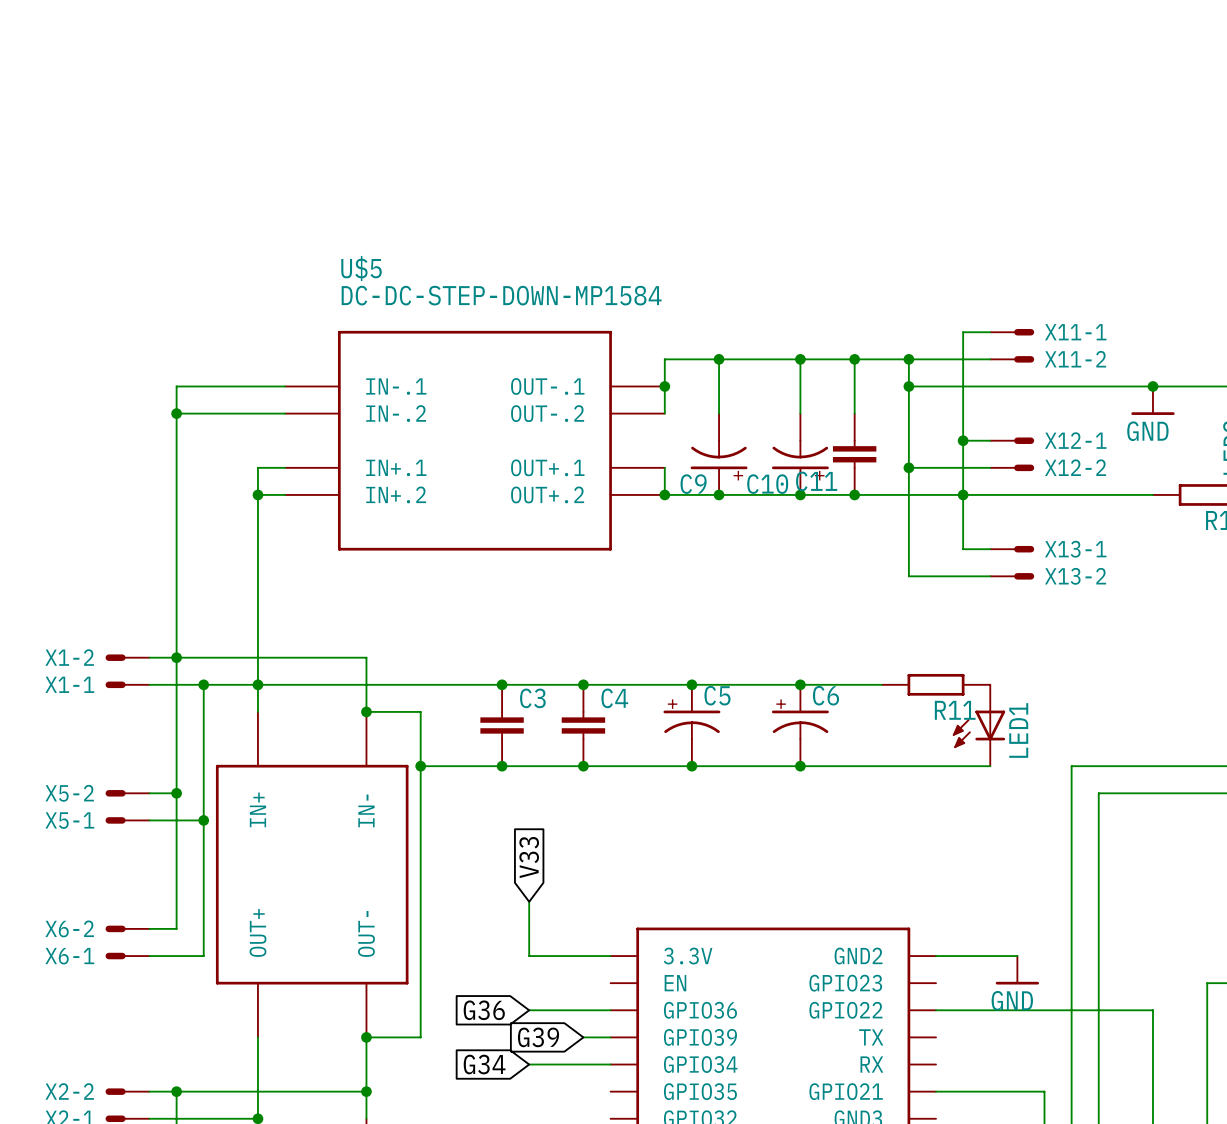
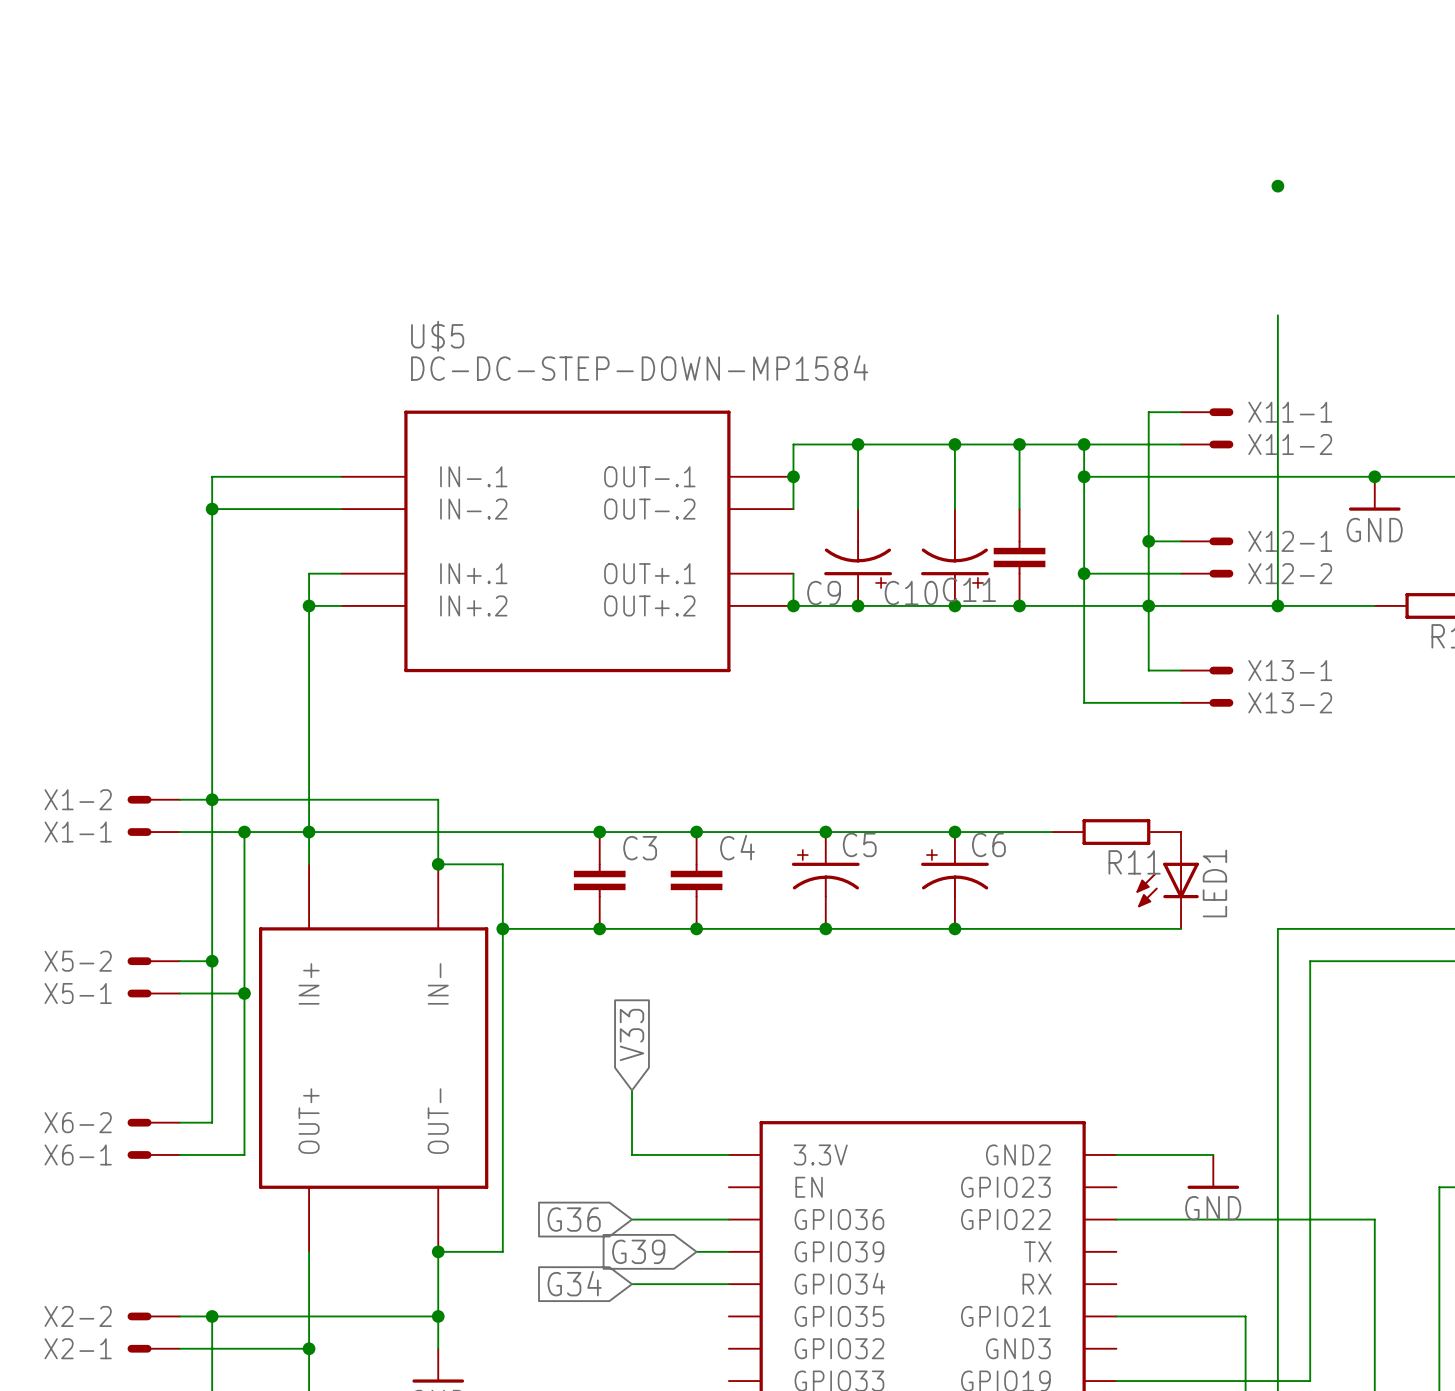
junction: none -> (1277, 186)
wire: none -> (1277, 315) (1277, 605)
junction: none -> (1277, 605)

